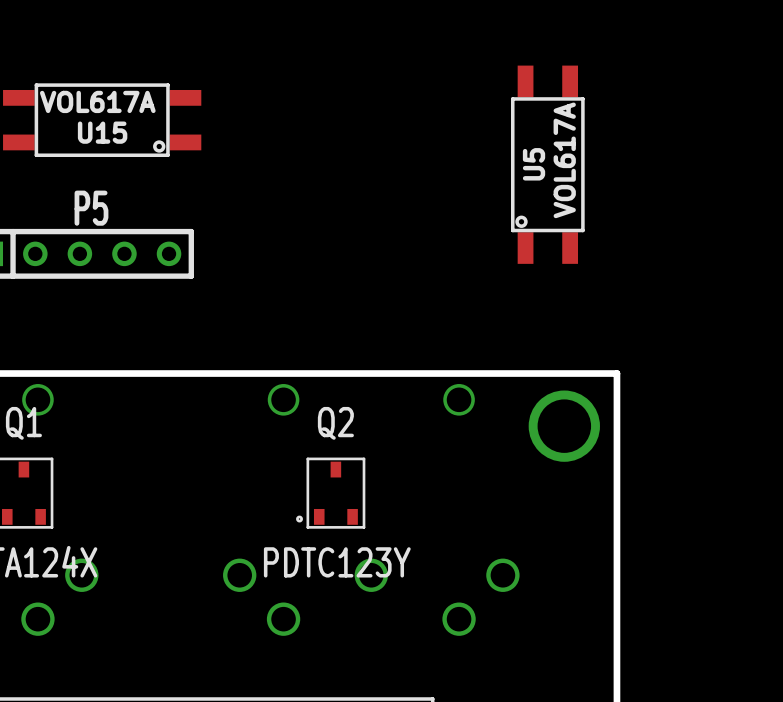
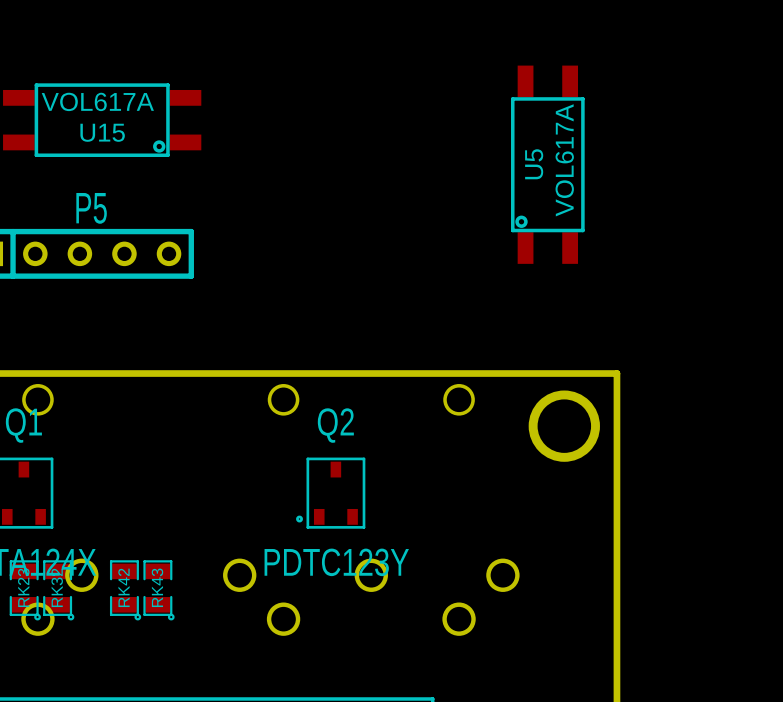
RK23: none -> (25, 590)
RK32: none -> (58, 590)
RK42: none -> (125, 590)
RK43: none -> (158, 590)

